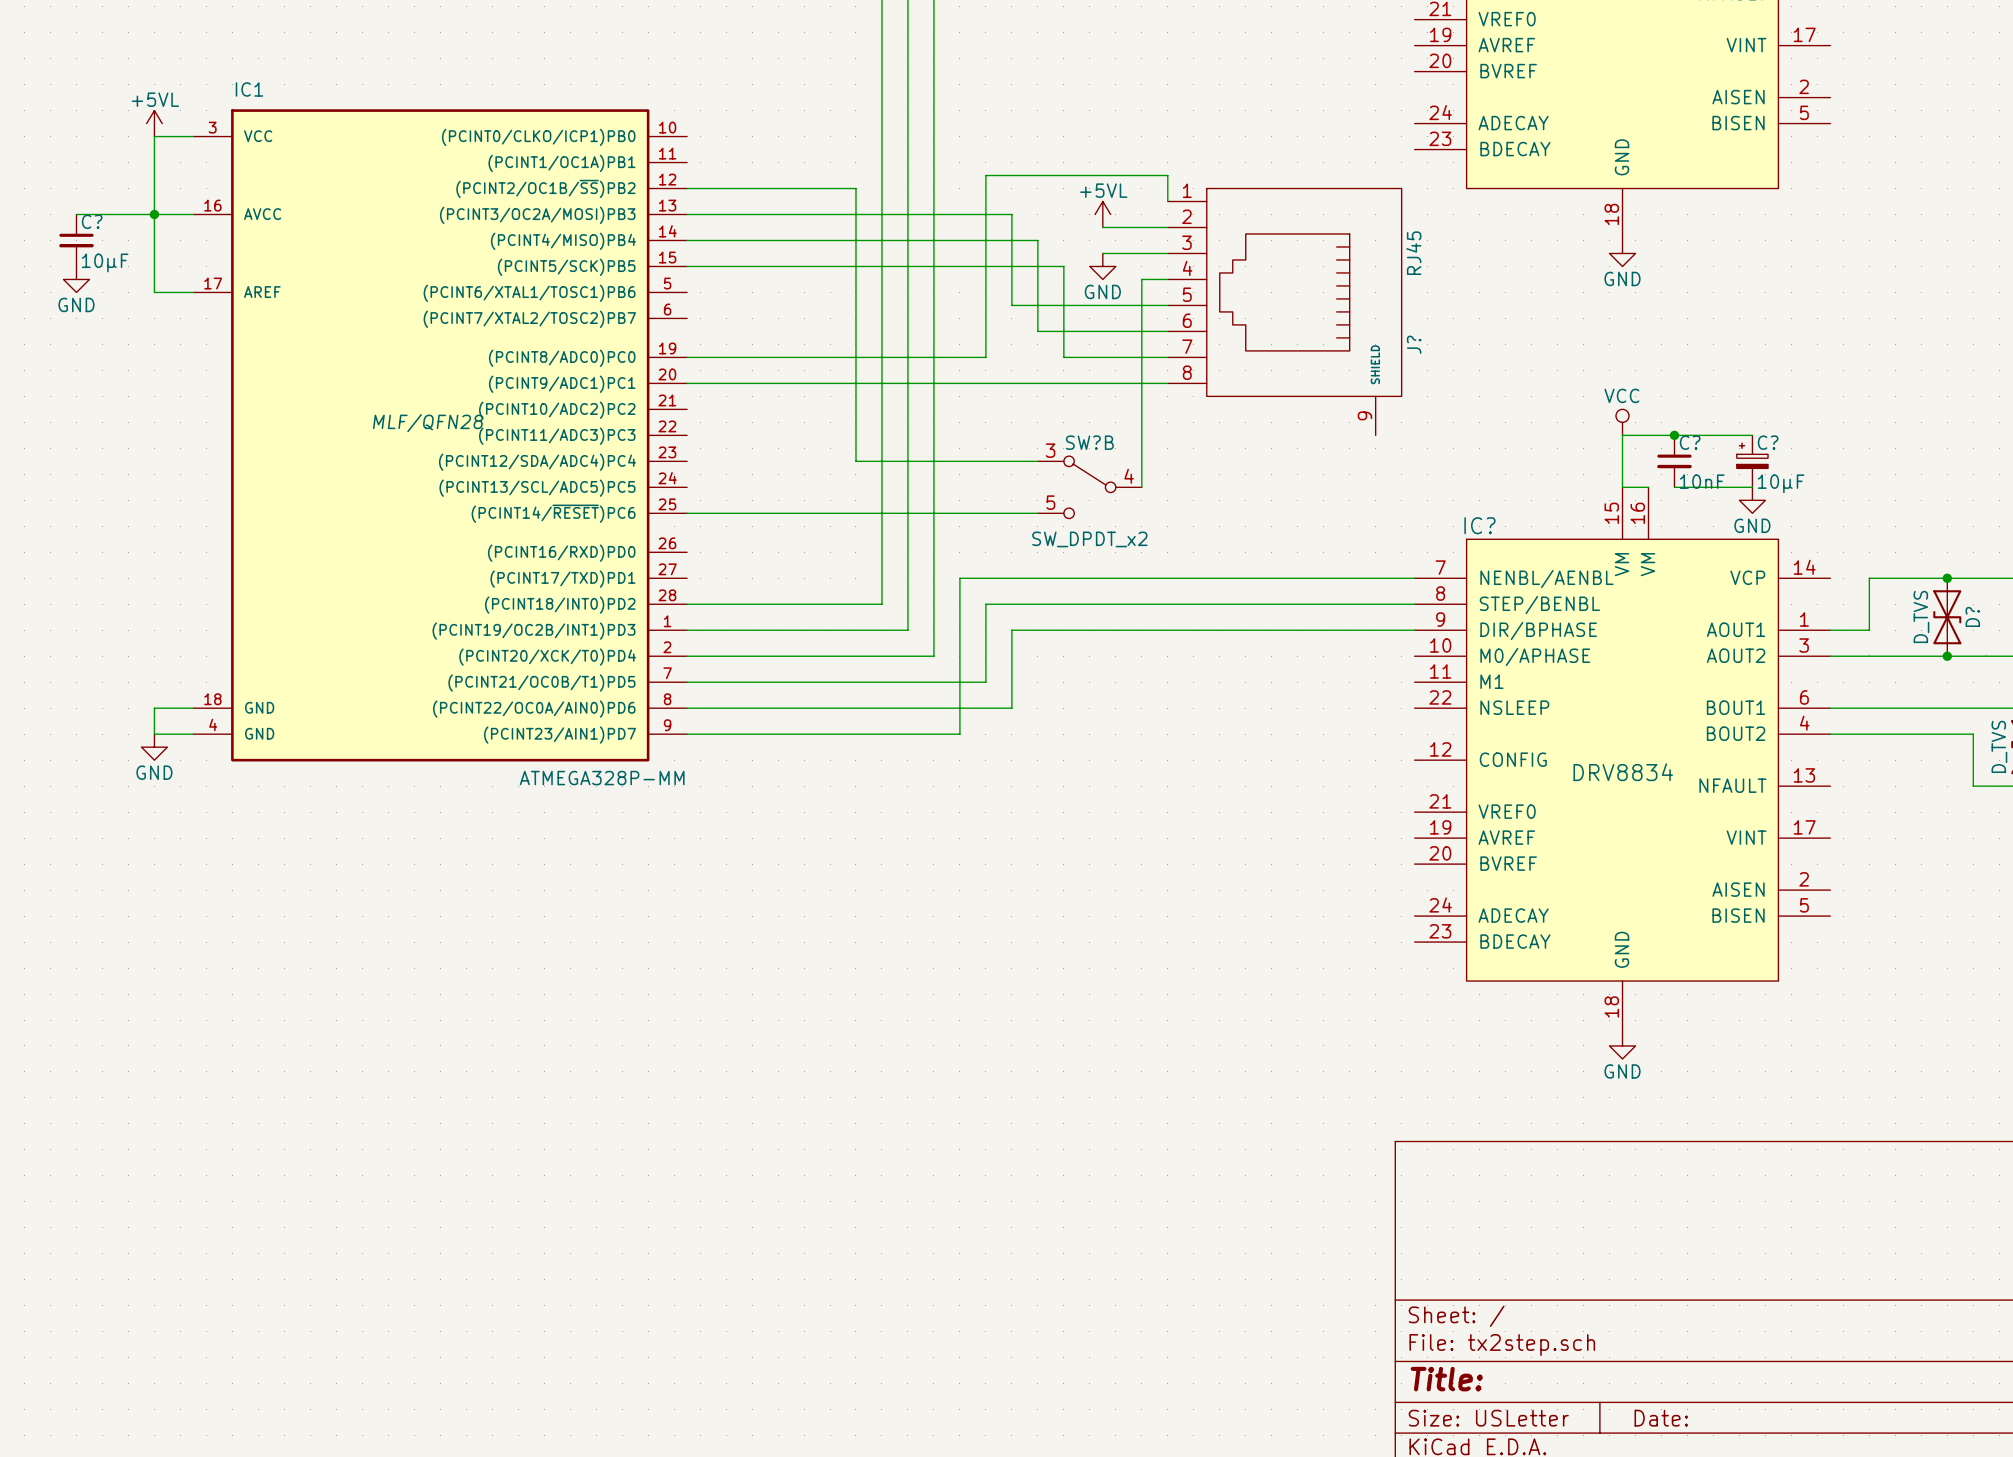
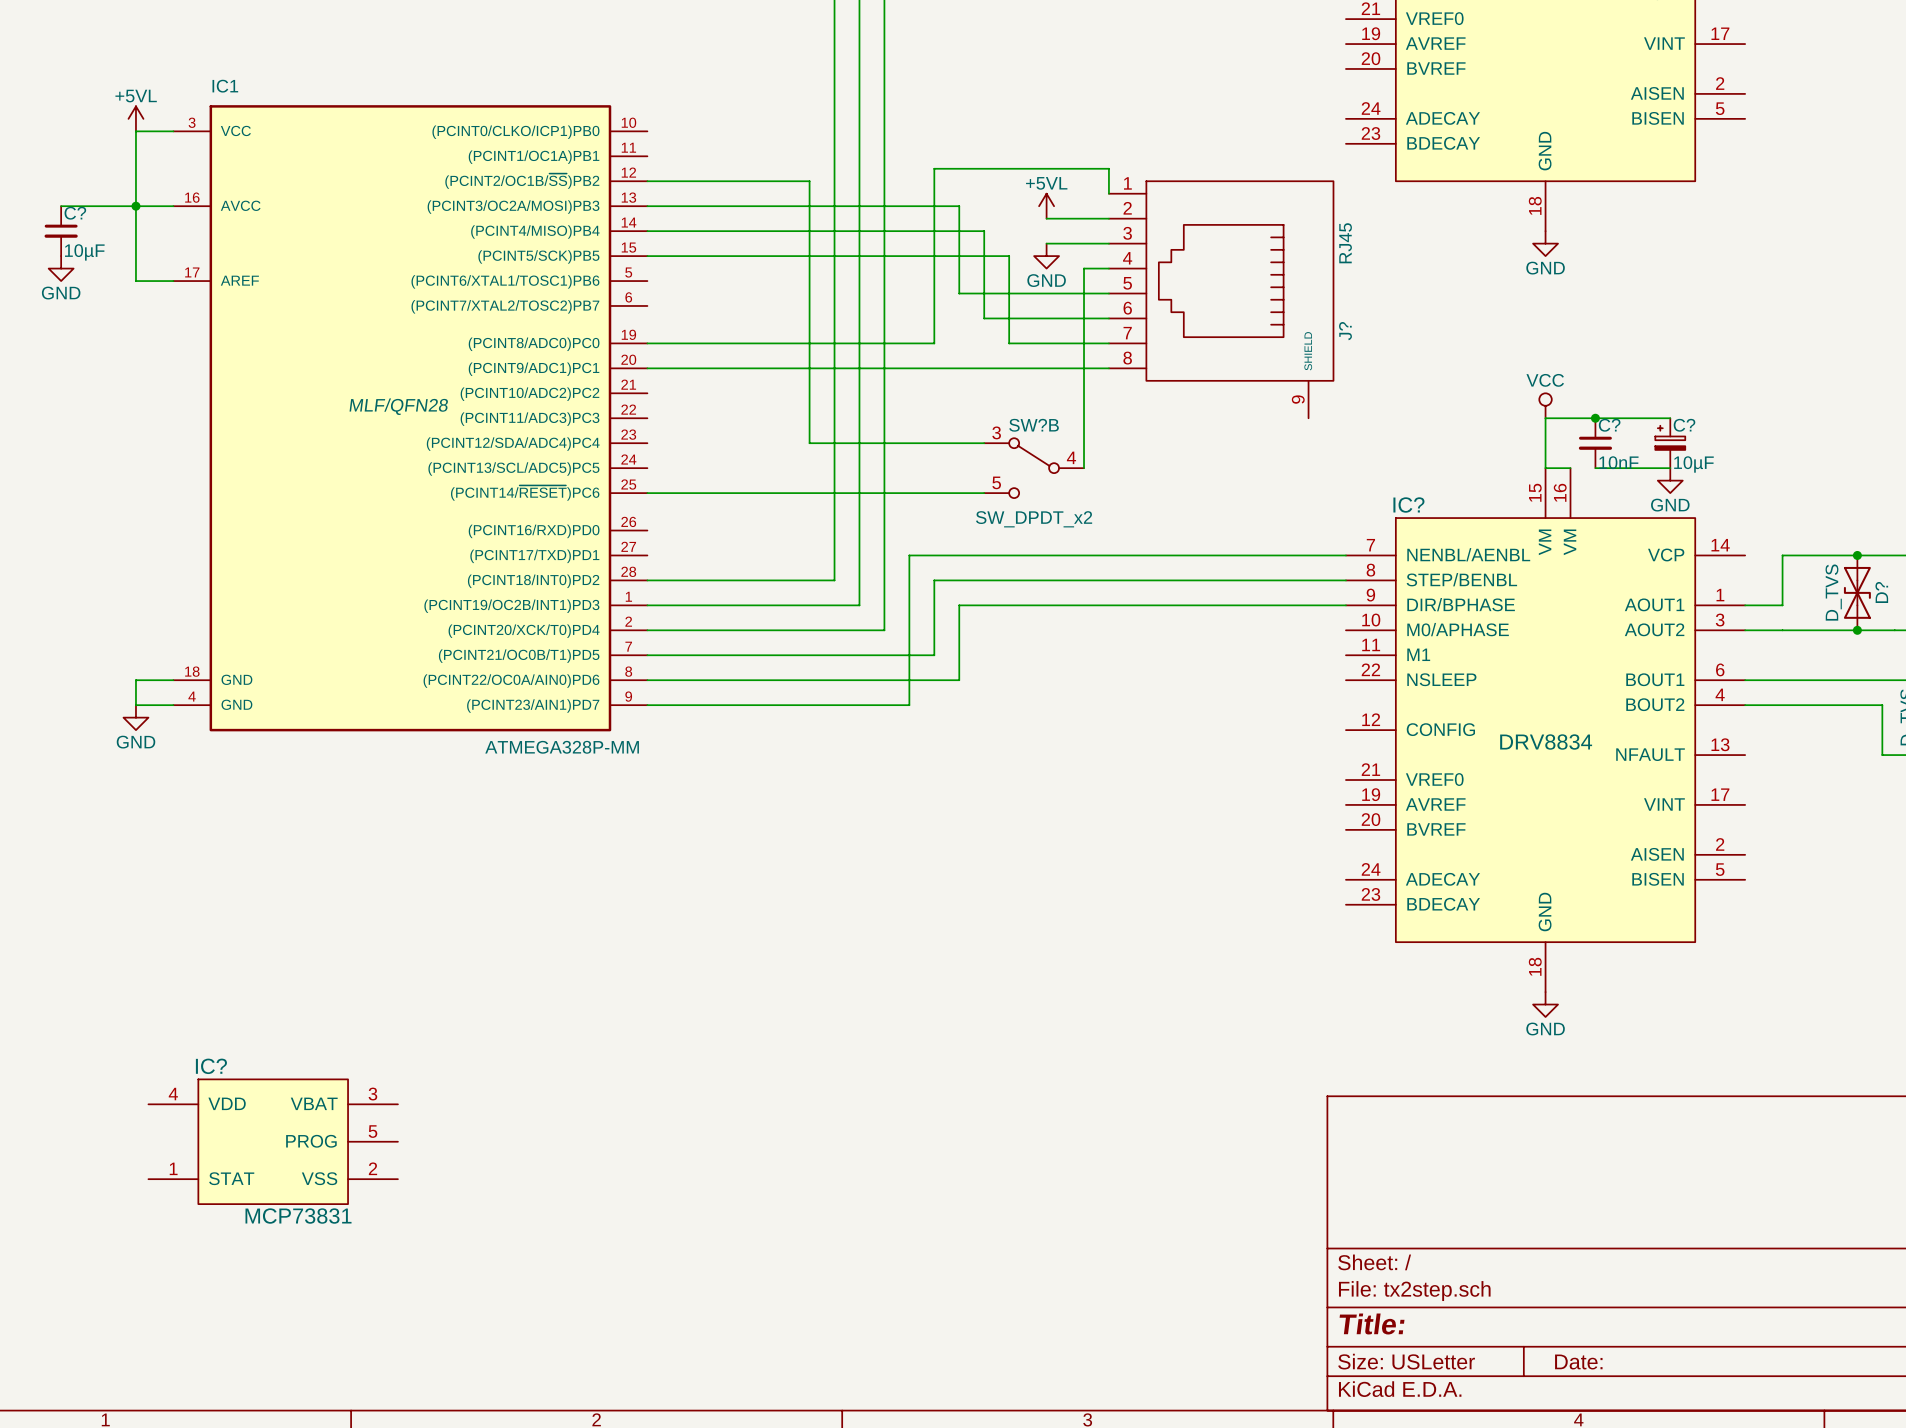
IC?: none -> MCP73831 (273, 1141)

